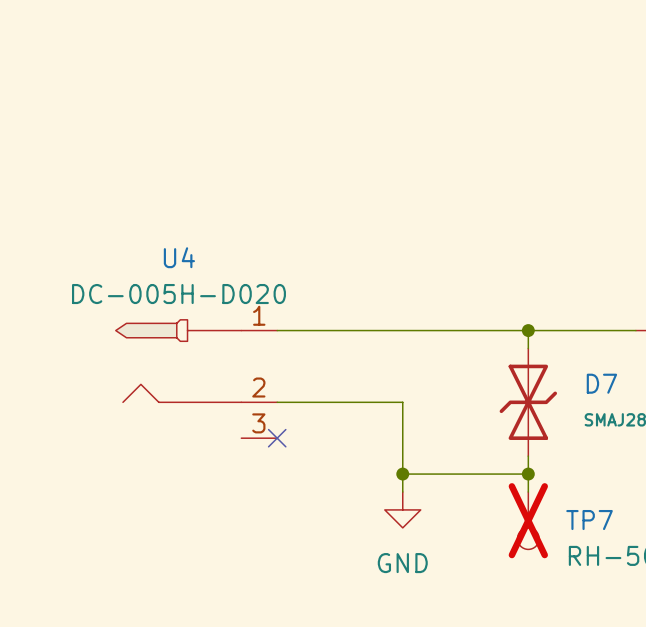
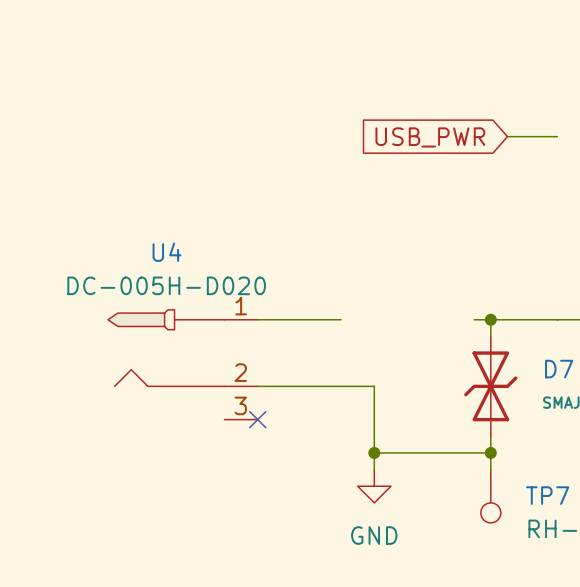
wire: none -> (507, 136) (557, 136)
global label: none -> USB_PWR (430, 137)
wire: (366, 330) (510, 330) -> none
TP7 do-not-place cross: (528, 520) -> none

